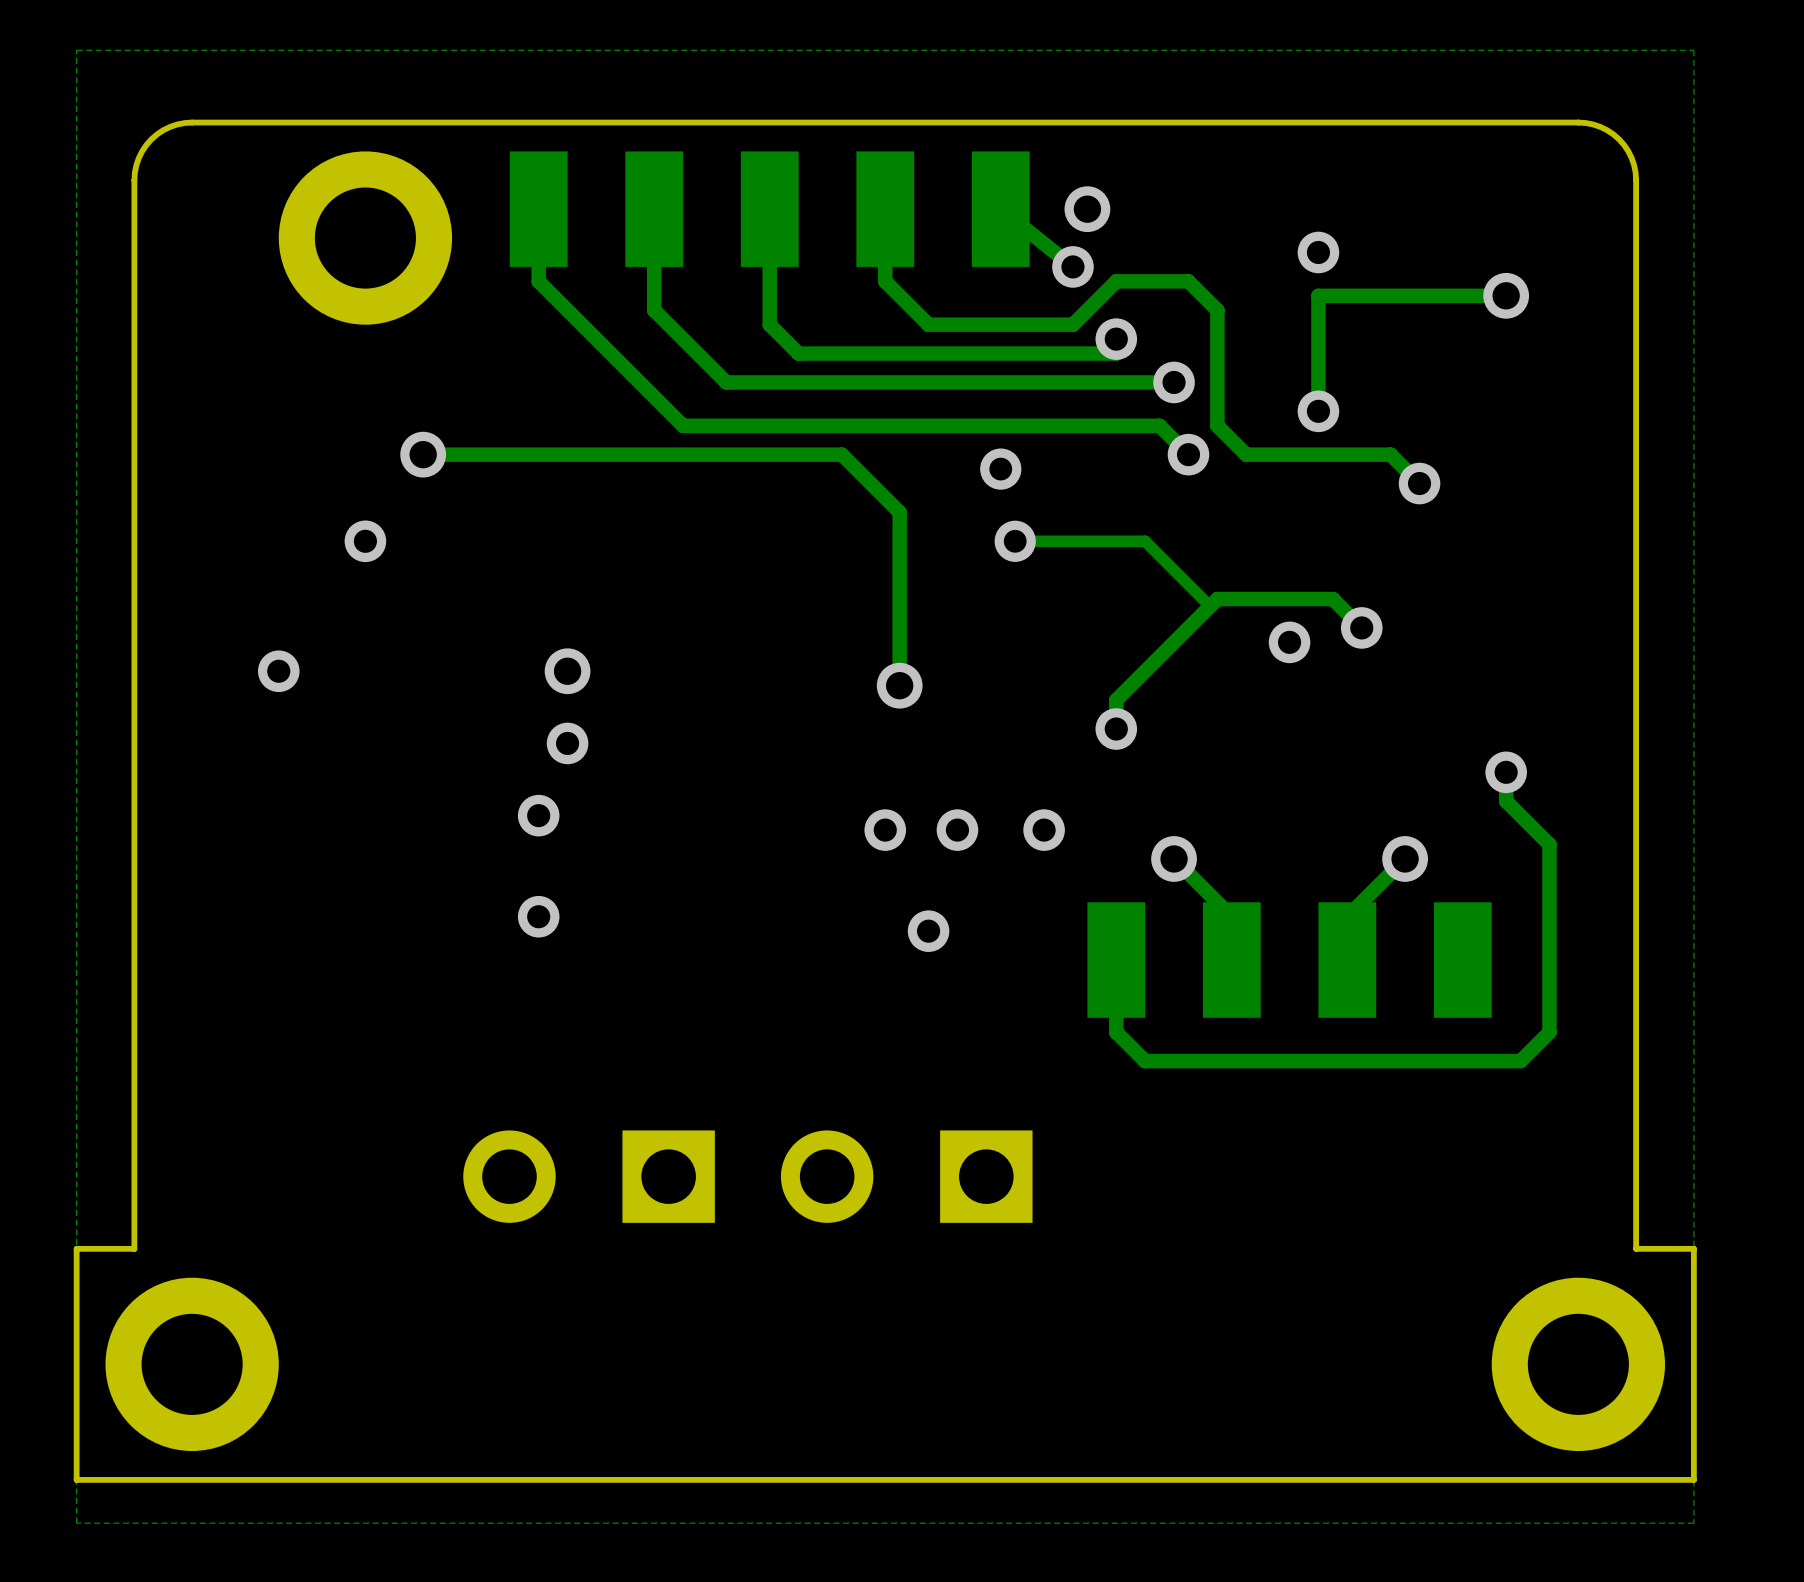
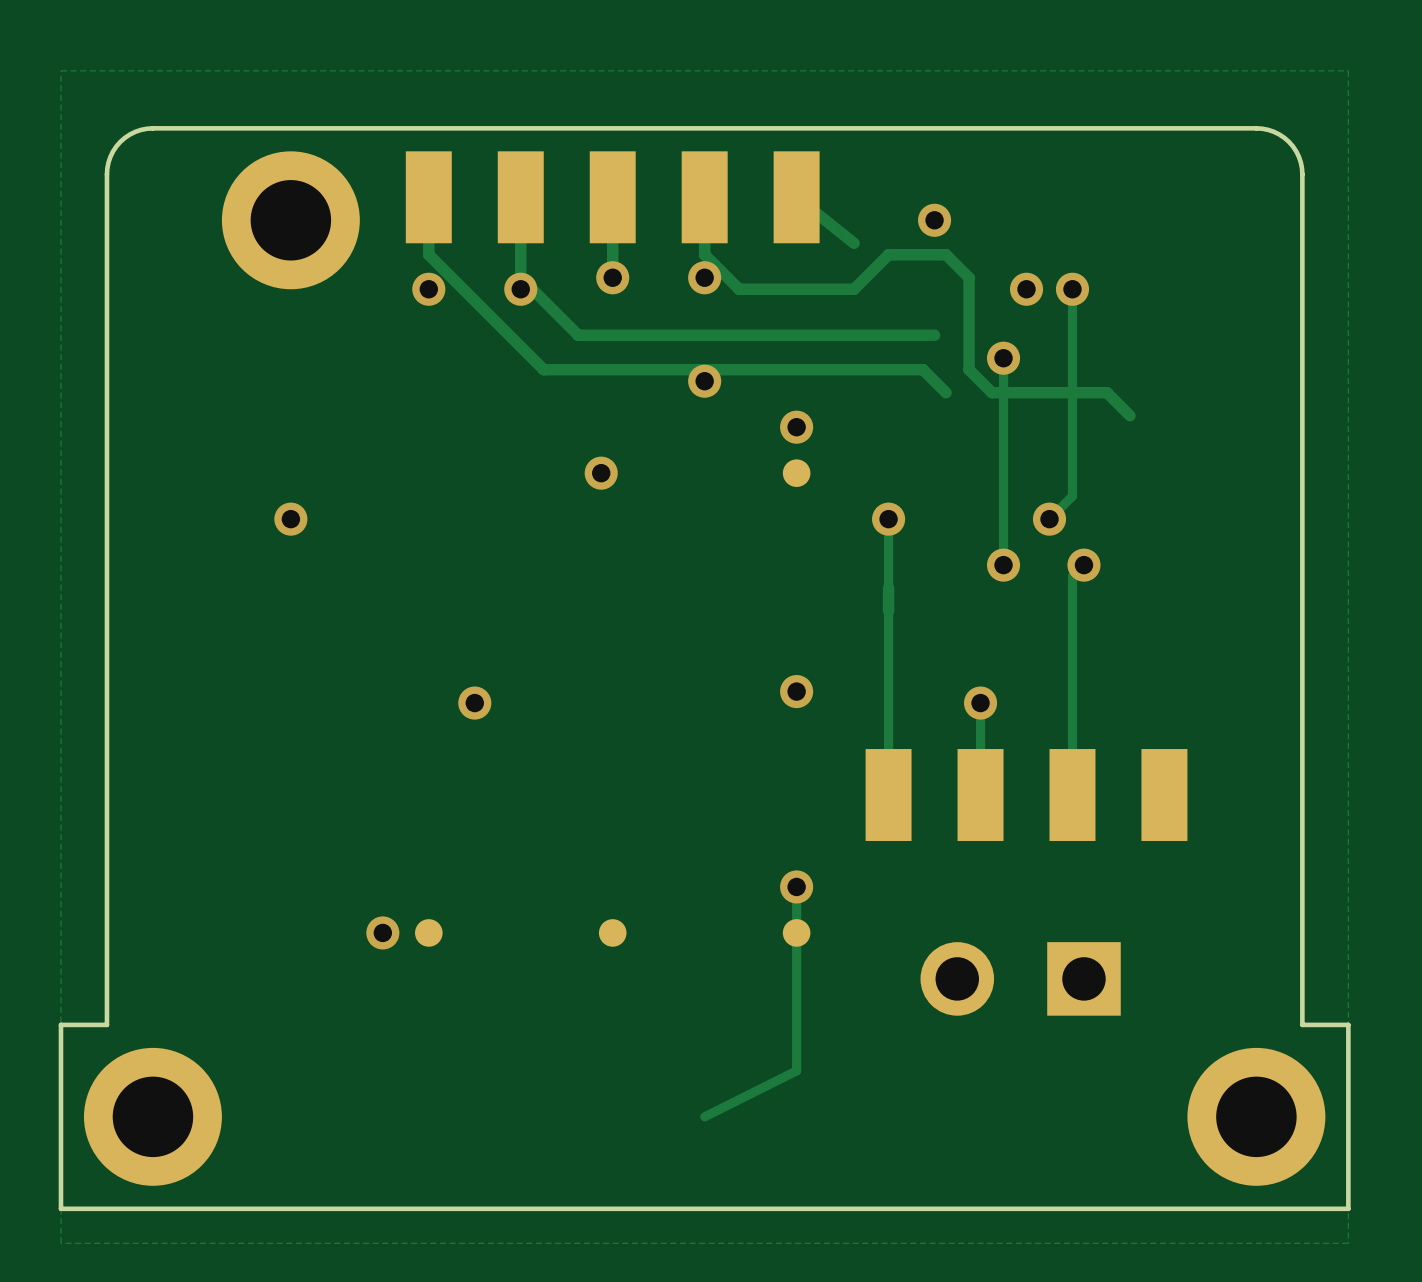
via: (1087, 209) -> none
via: none -> (934, 220)
via: (1318, 252) -> none
via: (1072, 266) -> none
track: (1506, 295) (1318, 295) (1318, 411) -> none
via: (1506, 295) -> none
track: (769, 310) (769, 324) (798, 353) (1116, 353) (1116, 339) -> none
via: none -> (612, 277)
via: none -> (704, 277)
via: none -> (428, 289)
via: none -> (520, 289)
via: none -> (1026, 289)
track: none -> (1072, 289) (1072, 496) (1049, 519)
via: none -> (1072, 289)
via: (1116, 339) -> none
via: (1174, 382) -> none
track: none -> (1003, 358) (1003, 565)
via: none -> (1003, 358)
via: (1318, 411) -> none
via: none -> (704, 381)
track: (423, 454) (841, 454) (899, 512) (899, 685) -> none
via: (423, 454) -> none
via: (1188, 454) -> none
via position: (1000, 469) -> (796, 427)
via: (1419, 483) -> none
via: (365, 541) -> none
track: (1015, 541) (1145, 541) (1210, 606) -> none
via: (1015, 541) -> none
via: none -> (601, 473)
part: none -> (796, 473)
via: none -> (290, 519)
via: none -> (888, 519)
via: none -> (1049, 519)
track: (1361, 627) (1332, 599) (1217, 599) (1116, 700) -> (888, 519) (888, 588)
via: (1361, 627) -> none
via: (1289, 642) -> none
via: (278, 671) -> none
via: (567, 671) -> none
via: none -> (1003, 565)
via: none -> (1083, 565)
via: (899, 685) -> none
via: (1116, 729) -> none
via: (567, 743) -> none
track: (1506, 772) (1506, 801) (1549, 844) (1549, 1032) (1520, 1061) (1145, 1061) (1116, 1032) (1116, 960) -> (888, 611) (888, 795)
via: (1506, 772) -> none
via: (538, 815) -> none
via: (885, 830) -> none
via: (957, 830) -> none
via: none -> (796, 691)
via: (1044, 830) -> none
via: none -> (474, 703)
via: none -> (980, 703)
track: (1174, 858) (1231, 916) -> (980, 703) (980, 760)
via: (1174, 858) -> none
track: (1405, 858) (1347, 916) -> (1083, 565) (1072, 576) (1072, 760)
via: (1405, 858) -> none
via: (538, 916) -> none
via: (928, 931) -> none
track: none -> (796, 886) (796, 1070) (704, 1116)
via: none -> (796, 886)
via: none -> (382, 932)
part: none -> (428, 932)
part: none -> (612, 932)
part: none -> (796, 932)
part: (589, 1176) -> none
part: (906, 1176) -> none
part: none -> (1020, 978)

